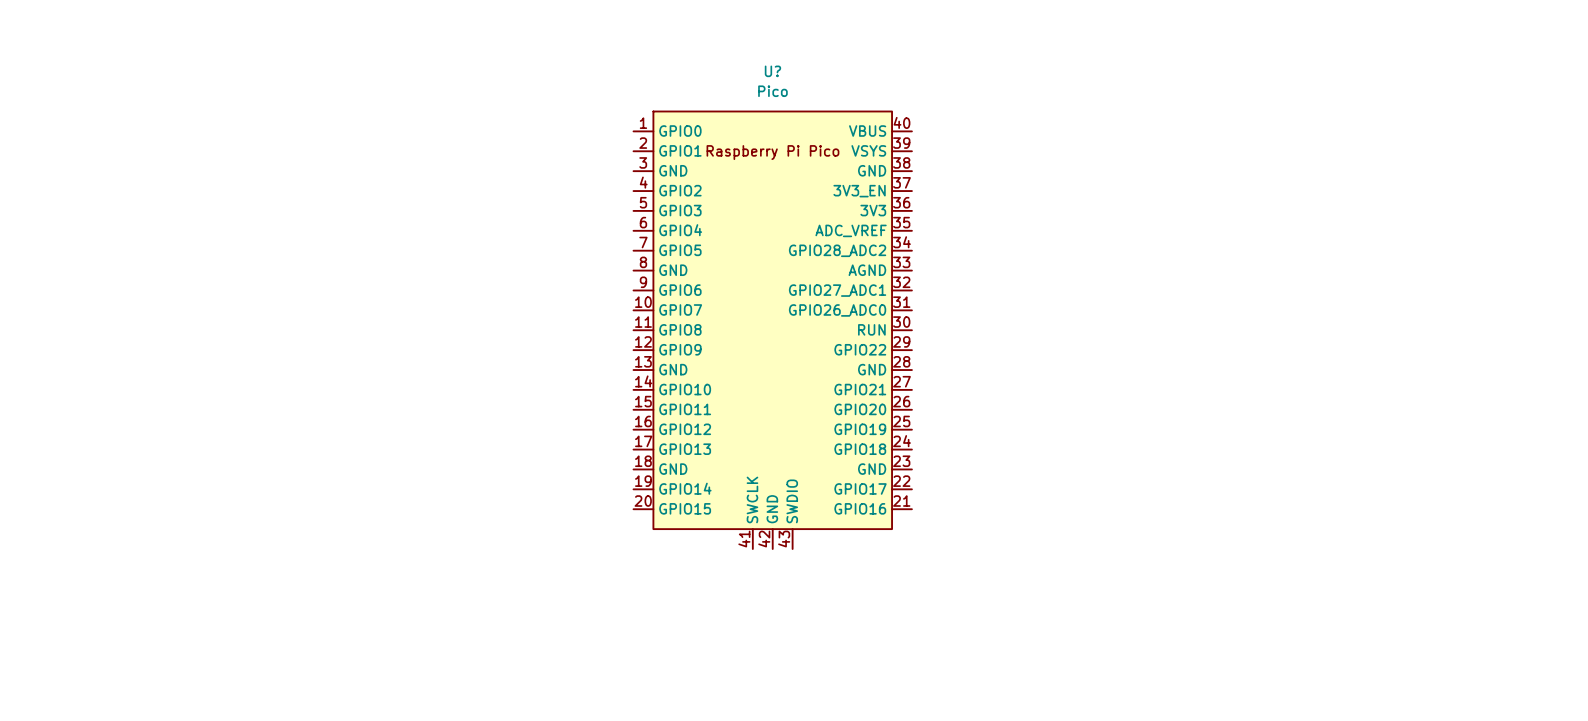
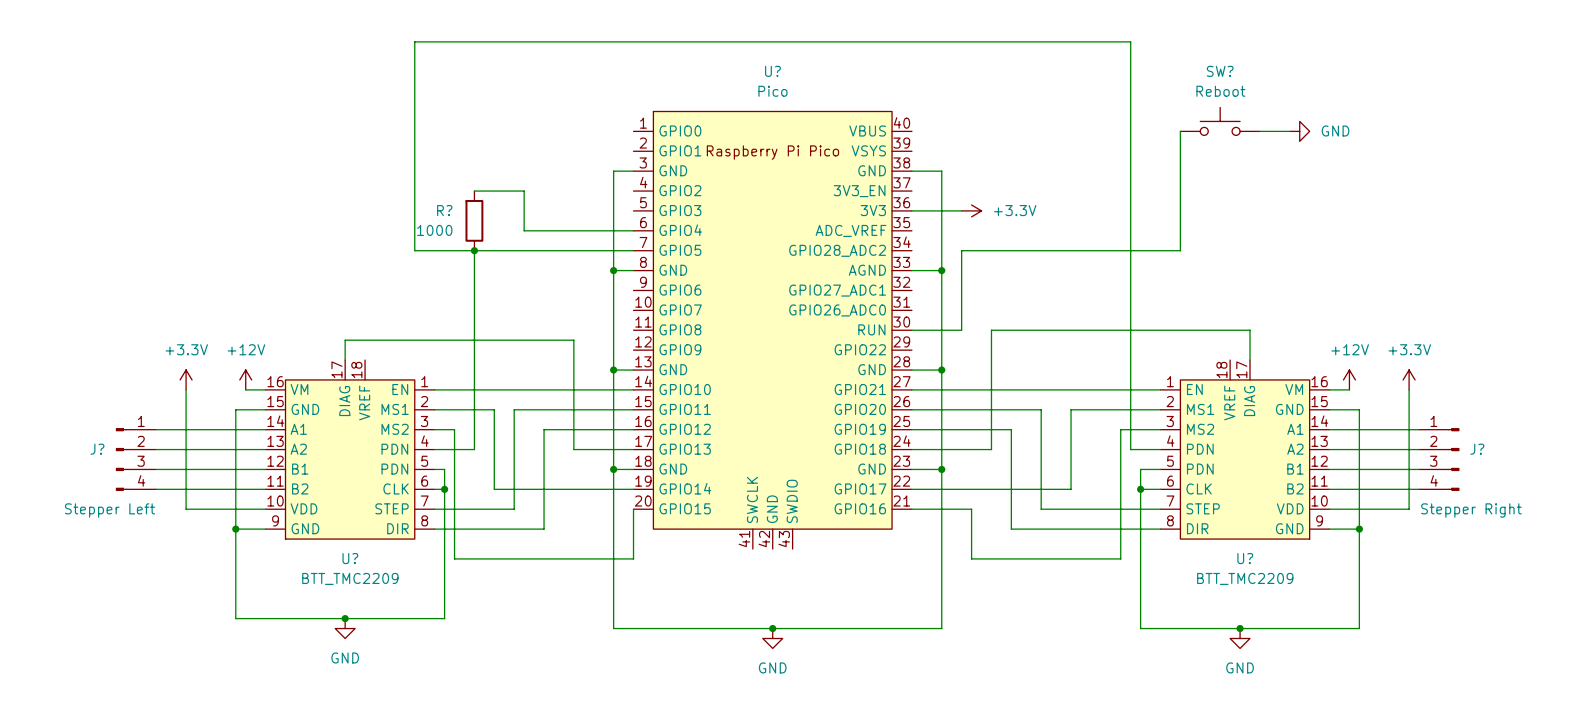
SW?: none -> Reboot (1220, 121)
wire: none -> (1180, 131) (1180, 250) (961, 250) (961, 330) (911, 330)
wire: none -> (1259, 131) (1289, 131)
power symbol: none -> GND (1299, 131)
wire: none -> (633, 171) (613, 171) (613, 628) (941, 628) (941, 171) (911, 171)
wire: none -> (474, 191) (524, 191) (524, 230) (633, 230)
wire: none -> (911, 210) (961, 210)
power symbol: none -> +3.3V (971, 210)
R?: none -> 1000 (474, 220)
wire: none -> (474, 250) (474, 449) (434, 449)
junction: none -> (474, 250)
wire: none -> (633, 250) (414, 250) (414, 41) (1130, 41) (1130, 449) (1160, 449)
wire: none -> (613, 270) (633, 270)
junction: none -> (613, 270)
wire: none -> (911, 270) (941, 270)
junction: none -> (941, 270)
wire: none -> (345, 360) (345, 340) (573, 340) (573, 449) (633, 449)
wire: none -> (1250, 360) (1250, 330) (991, 330) (991, 449) (911, 449)
wire: none -> (613, 370) (633, 370)
junction: none -> (613, 370)
wire: none -> (911, 370) (941, 370)
junction: none -> (941, 370)
power symbol: none -> +3.3V (186, 379)
power symbol: none -> +12V (245, 379)
power symbol: none -> +12V (1349, 379)
power symbol: none -> +3.3V (1409, 379)
wire: none -> (186, 389) (186, 509) (265, 509)
wire: none -> (245, 389) (265, 389)
wire: none -> (434, 389) (633, 389)
wire: none -> (911, 389) (1160, 389)
wire: none -> (1329, 389) (1349, 389)
wire: none -> (1409, 389) (1409, 509) (1329, 509)
wire: none -> (265, 409) (235, 409) (235, 618) (444, 618) (444, 469) (434, 469)
wire: none -> (434, 409) (494, 409) (494, 489) (633, 489)
wire: none -> (633, 409) (514, 409) (514, 509) (434, 509)
wire: none -> (911, 409) (1041, 409) (1041, 509) (1160, 509)
wire: none -> (1160, 409) (1071, 409) (1071, 489) (911, 489)
wire: none -> (1329, 409) (1359, 409) (1359, 628) (1140, 628) (1140, 469) (1160, 469)
wire: none -> (156, 429) (265, 429)
wire: none -> (434, 429) (454, 429) (454, 558) (633, 558) (633, 509)
wire: none -> (633, 429) (544, 429) (544, 529) (434, 529)
wire: none -> (911, 429) (1011, 429) (1011, 529) (1160, 529)
wire: none -> (1160, 429) (1120, 429) (1120, 558) (971, 558) (971, 509) (911, 509)
wire: none -> (1329, 429) (1419, 429)
wire: none -> (156, 449) (265, 449)
U?: none -> BTT_TMC2209 (350, 449)
U?: none -> BTT_TMC2209 (1245, 449)
wire: none -> (1329, 449) (1419, 449)
J?: none -> Stepper Left (136, 459)
J?: none -> Stepper Right (1439, 459)
wire: none -> (156, 469) (265, 469)
wire: none -> (613, 469) (633, 469)
junction: none -> (613, 469)
wire: none -> (911, 469) (941, 469)
junction: none -> (941, 469)
wire: none -> (1329, 469) (1419, 469)
wire: none -> (156, 489) (265, 489)
wire: none -> (434, 489) (444, 489)
junction: none -> (444, 489)
wire: none -> (1140, 489) (1160, 489)
junction: none -> (1140, 489)
wire: none -> (1329, 489) (1419, 489)
wire: none -> (235, 529) (265, 529)
junction: none -> (235, 529)
wire: none -> (1329, 529) (1359, 529)
junction: none -> (1359, 529)
junction: none -> (345, 618)
power symbol: none -> GND (345, 628)
junction: none -> (772, 628)
junction: none -> (1240, 628)
power symbol: none -> GND (772, 638)
power symbol: none -> GND (1240, 638)

